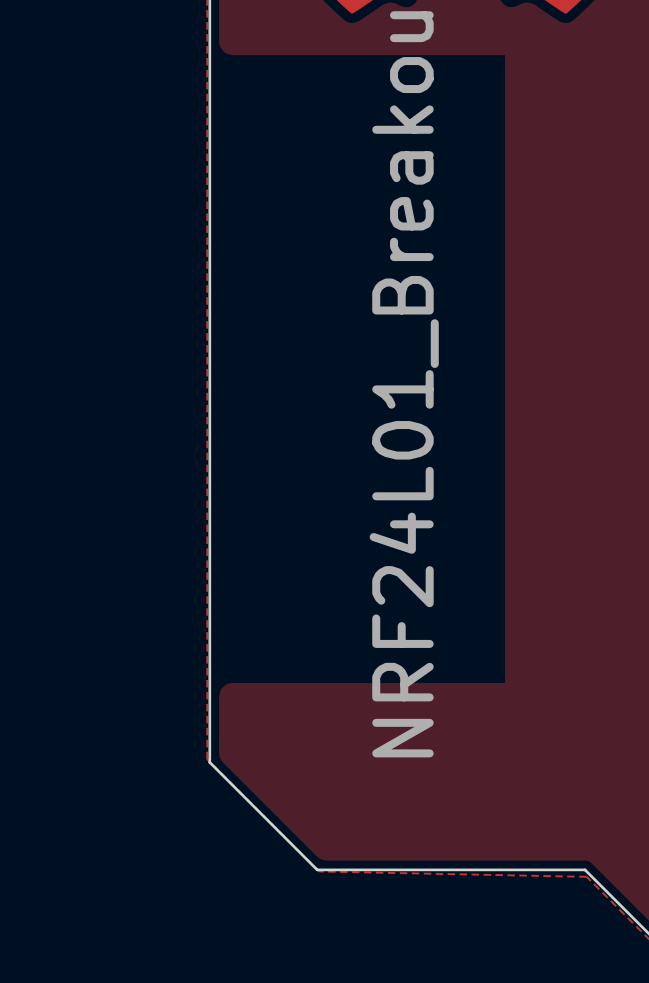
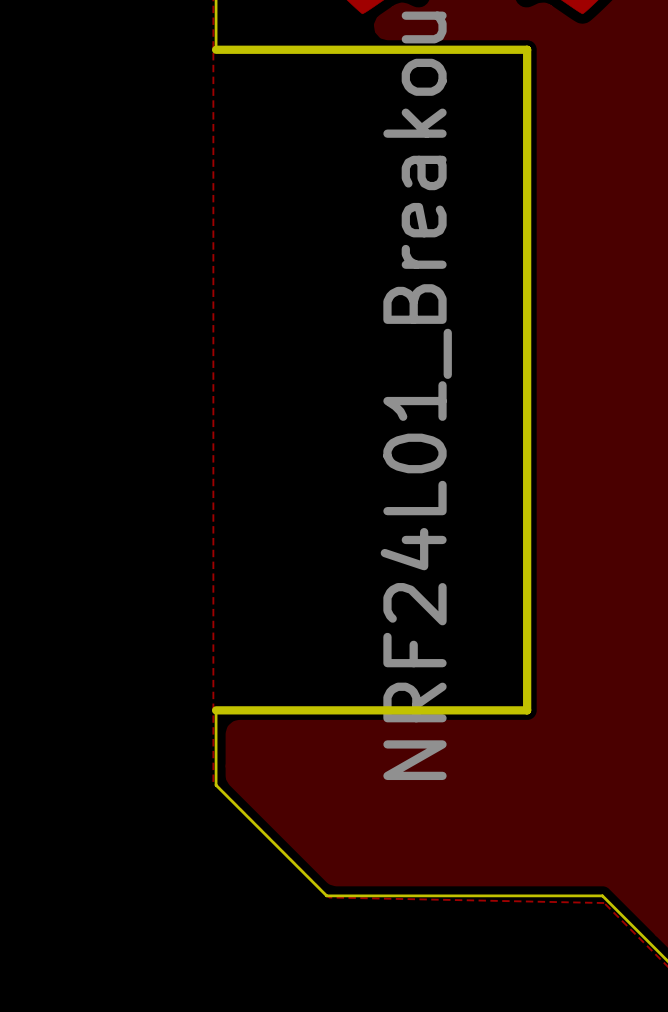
board edge: (209, 48) (209, 689) -> (216, 49) (527, 49) (527, 710) (216, 710)

